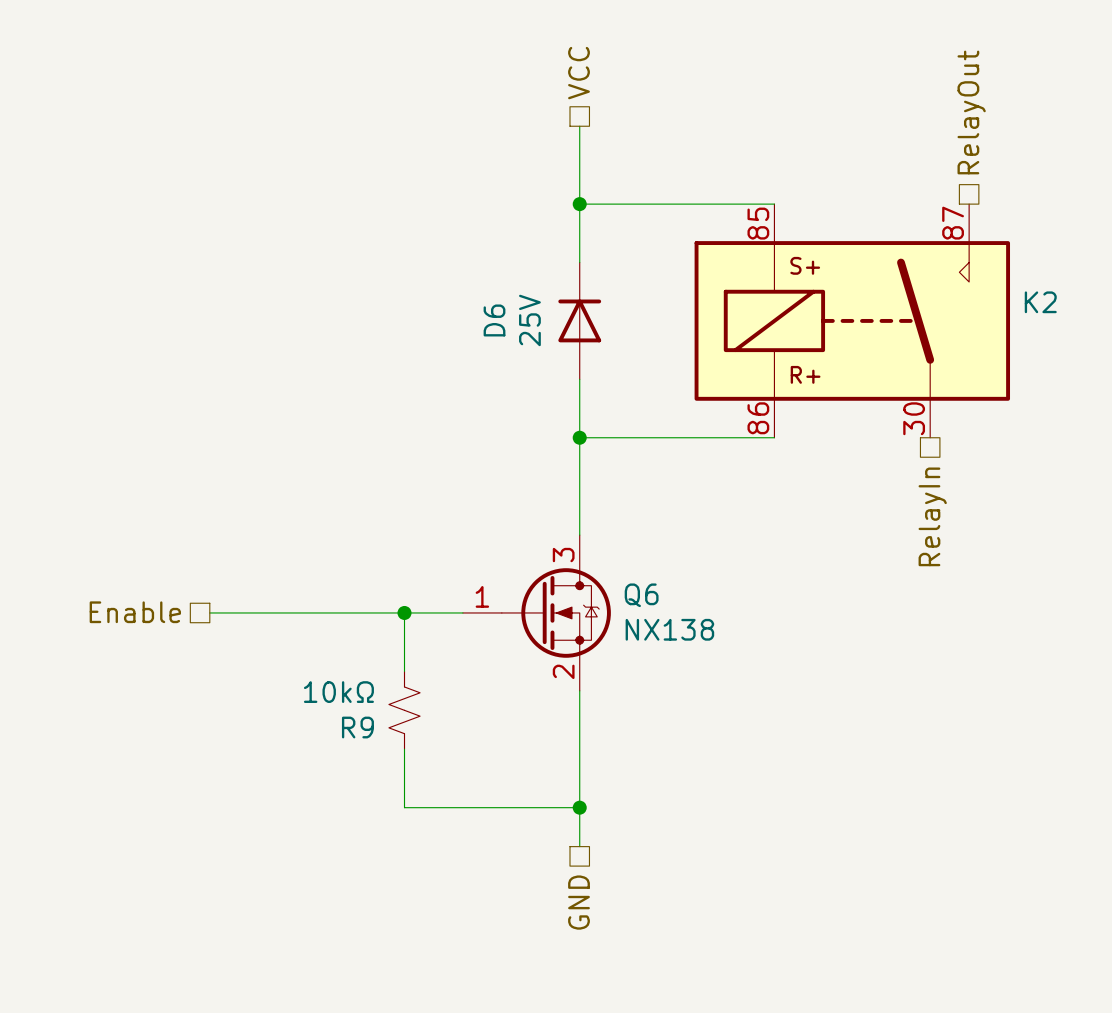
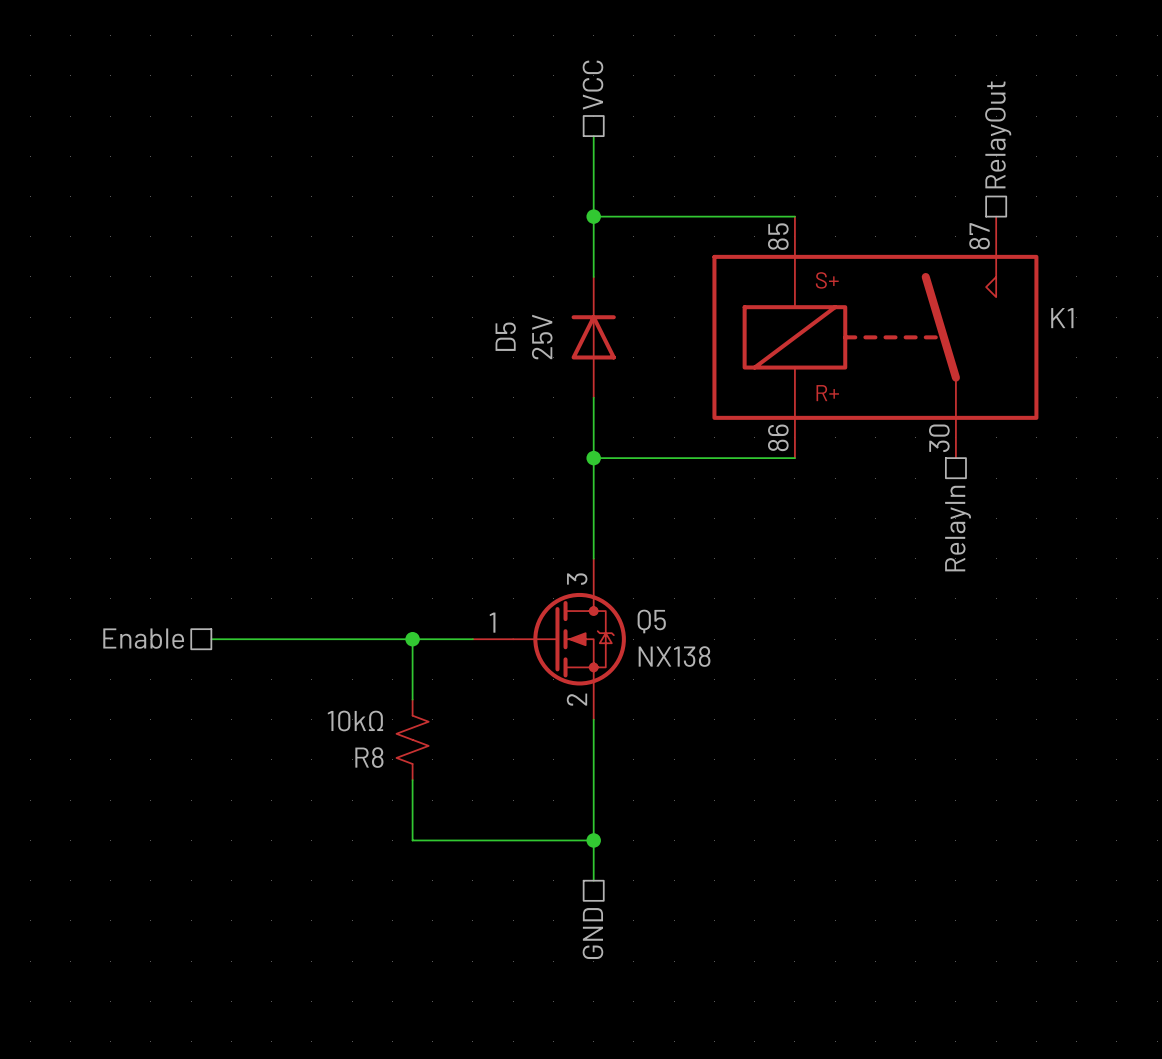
K2 name: K2 (1040, 302) -> K1 (1062, 318)
D6 name: D6 (494, 320) -> D5 (505, 336)
Q6 name: Q6 (641, 595) -> Q5 (651, 621)
R9 name: R9 (357, 727) -> R8 (369, 757)

